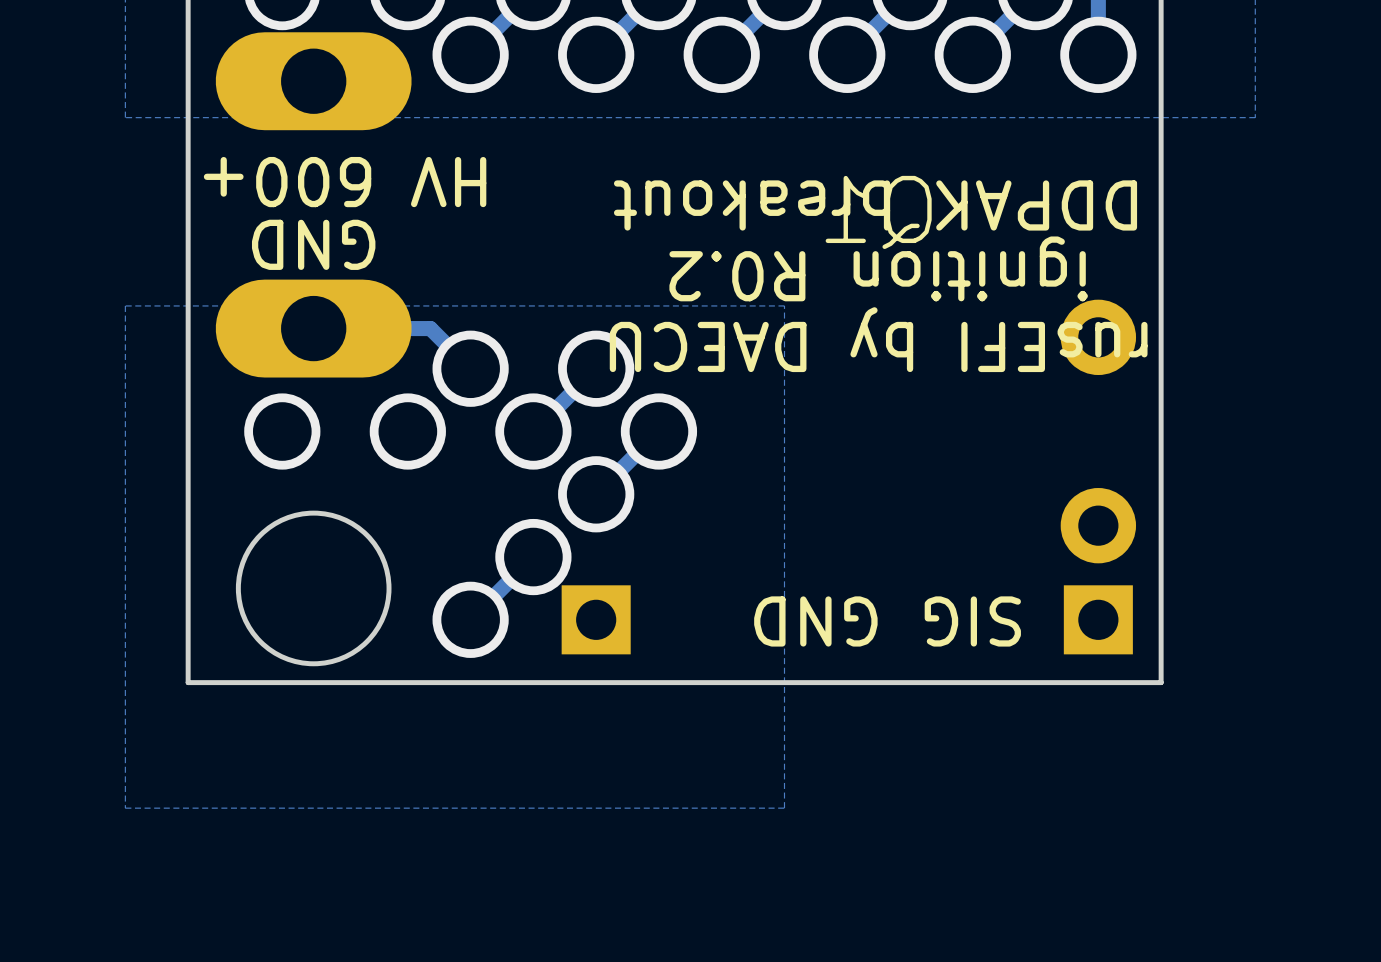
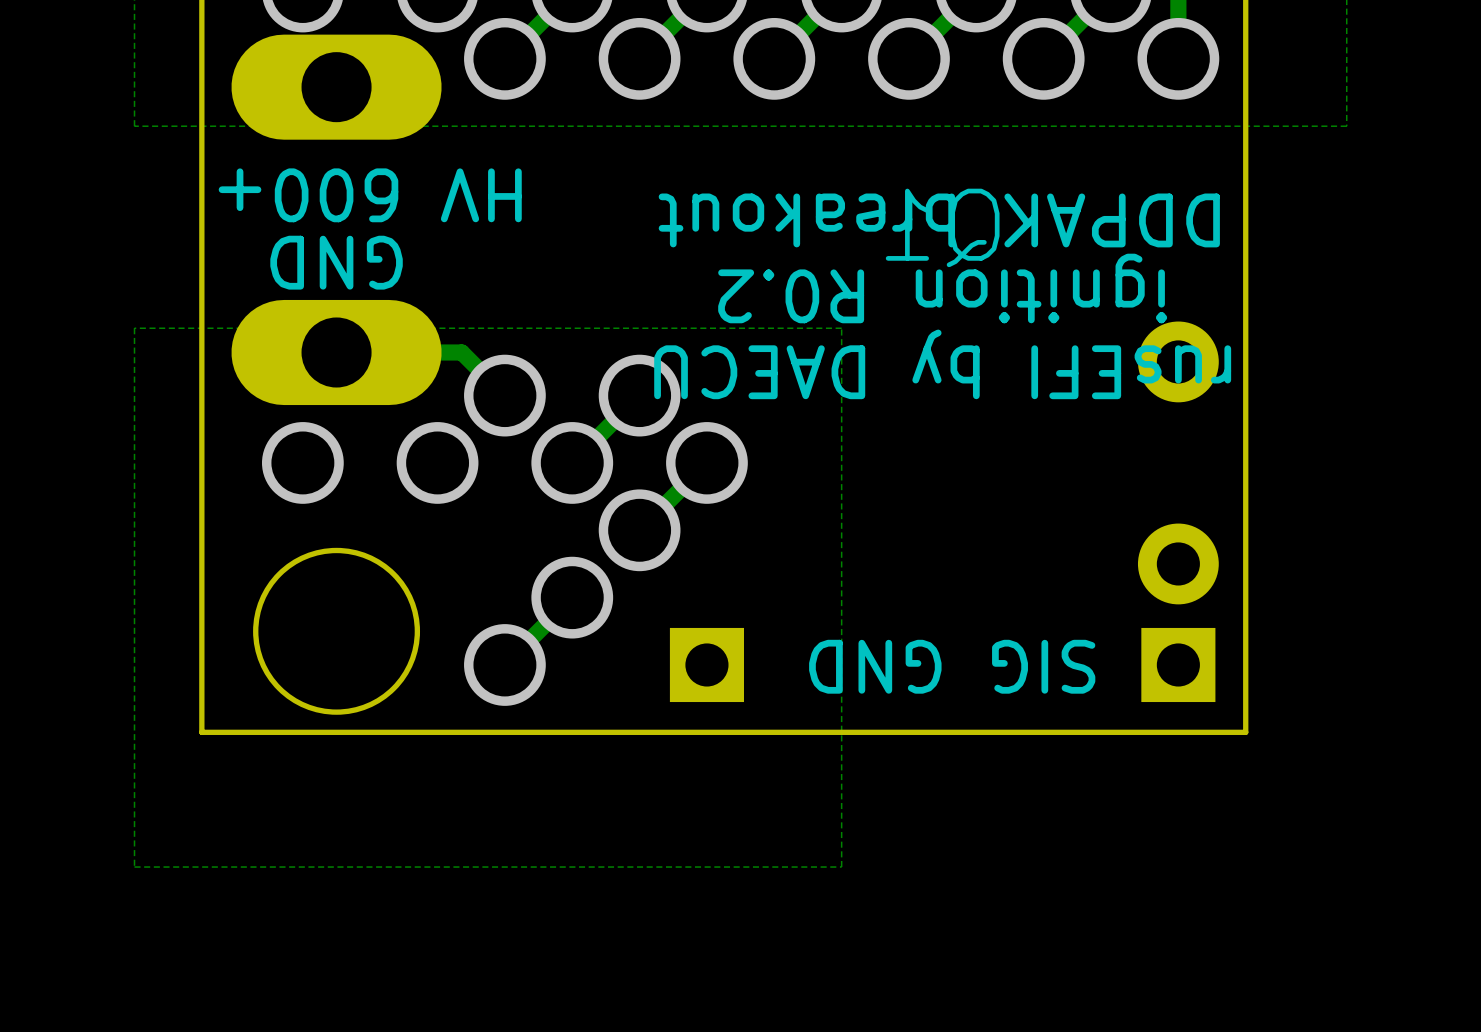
part position: (596, 619) -> (706, 664)

